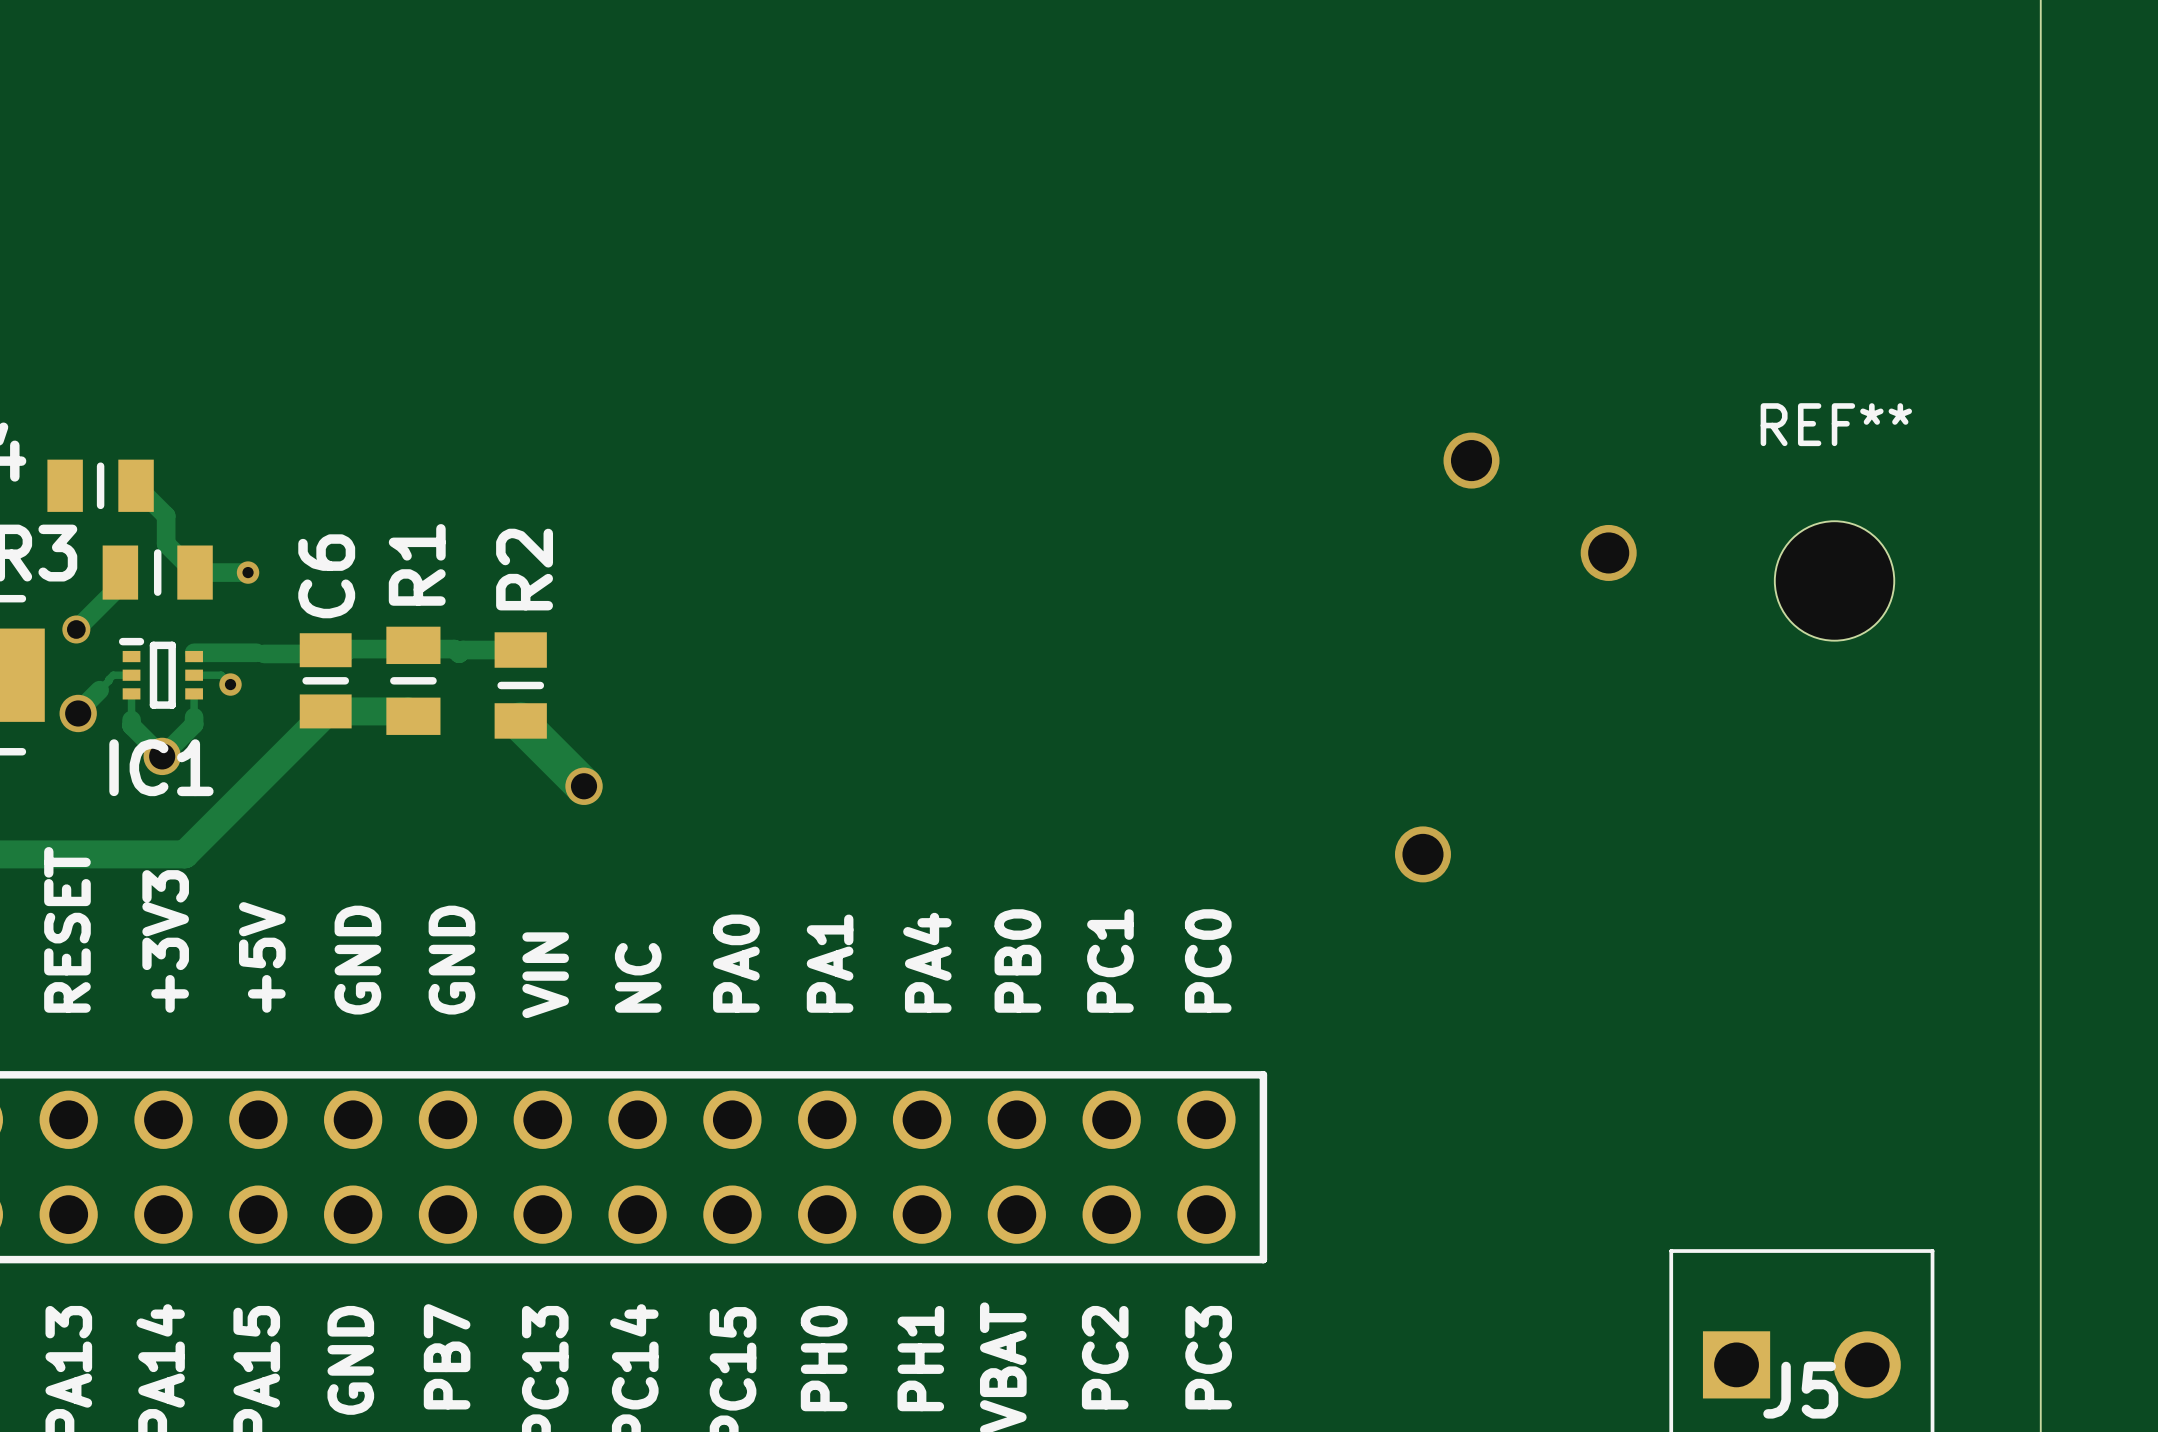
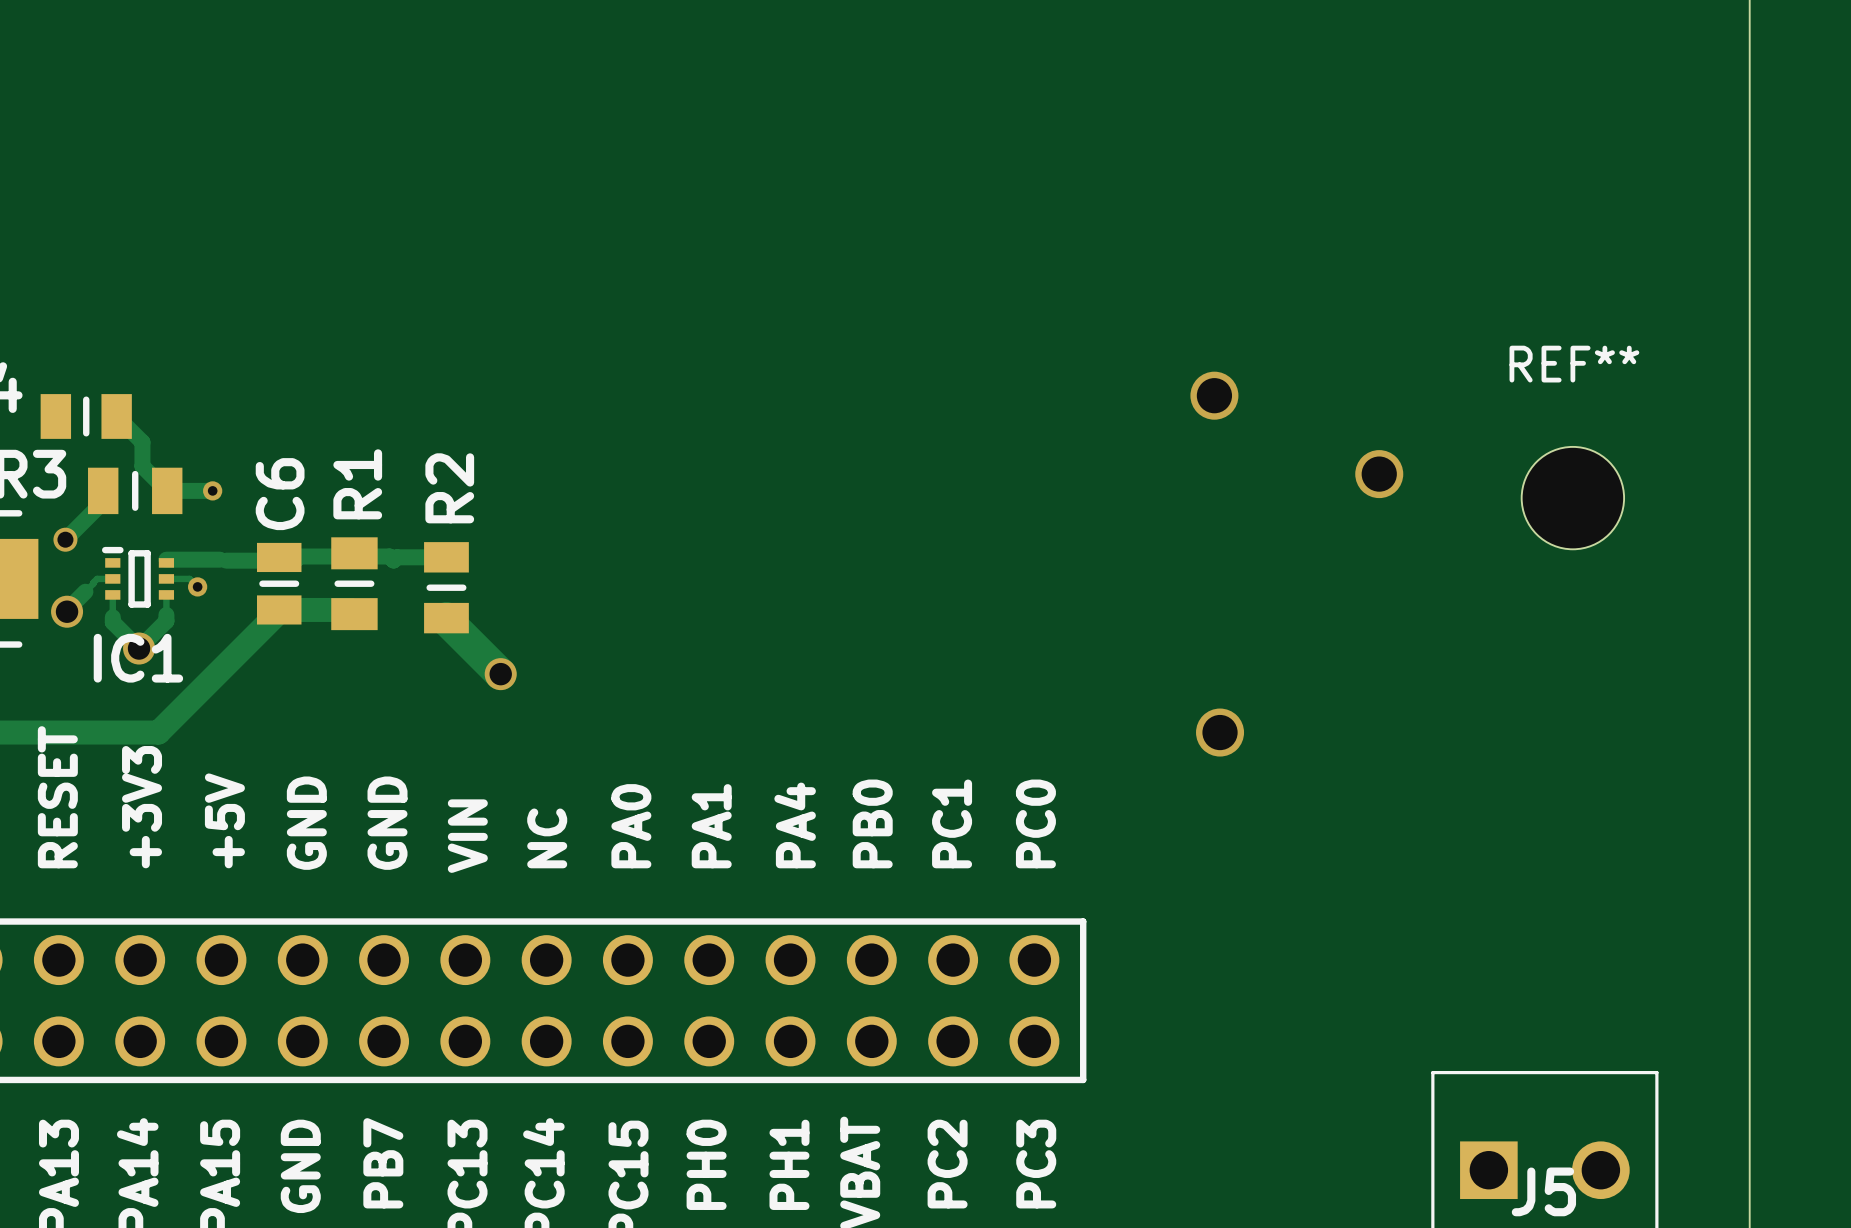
via position: (1471, 460) -> (1214, 395)

